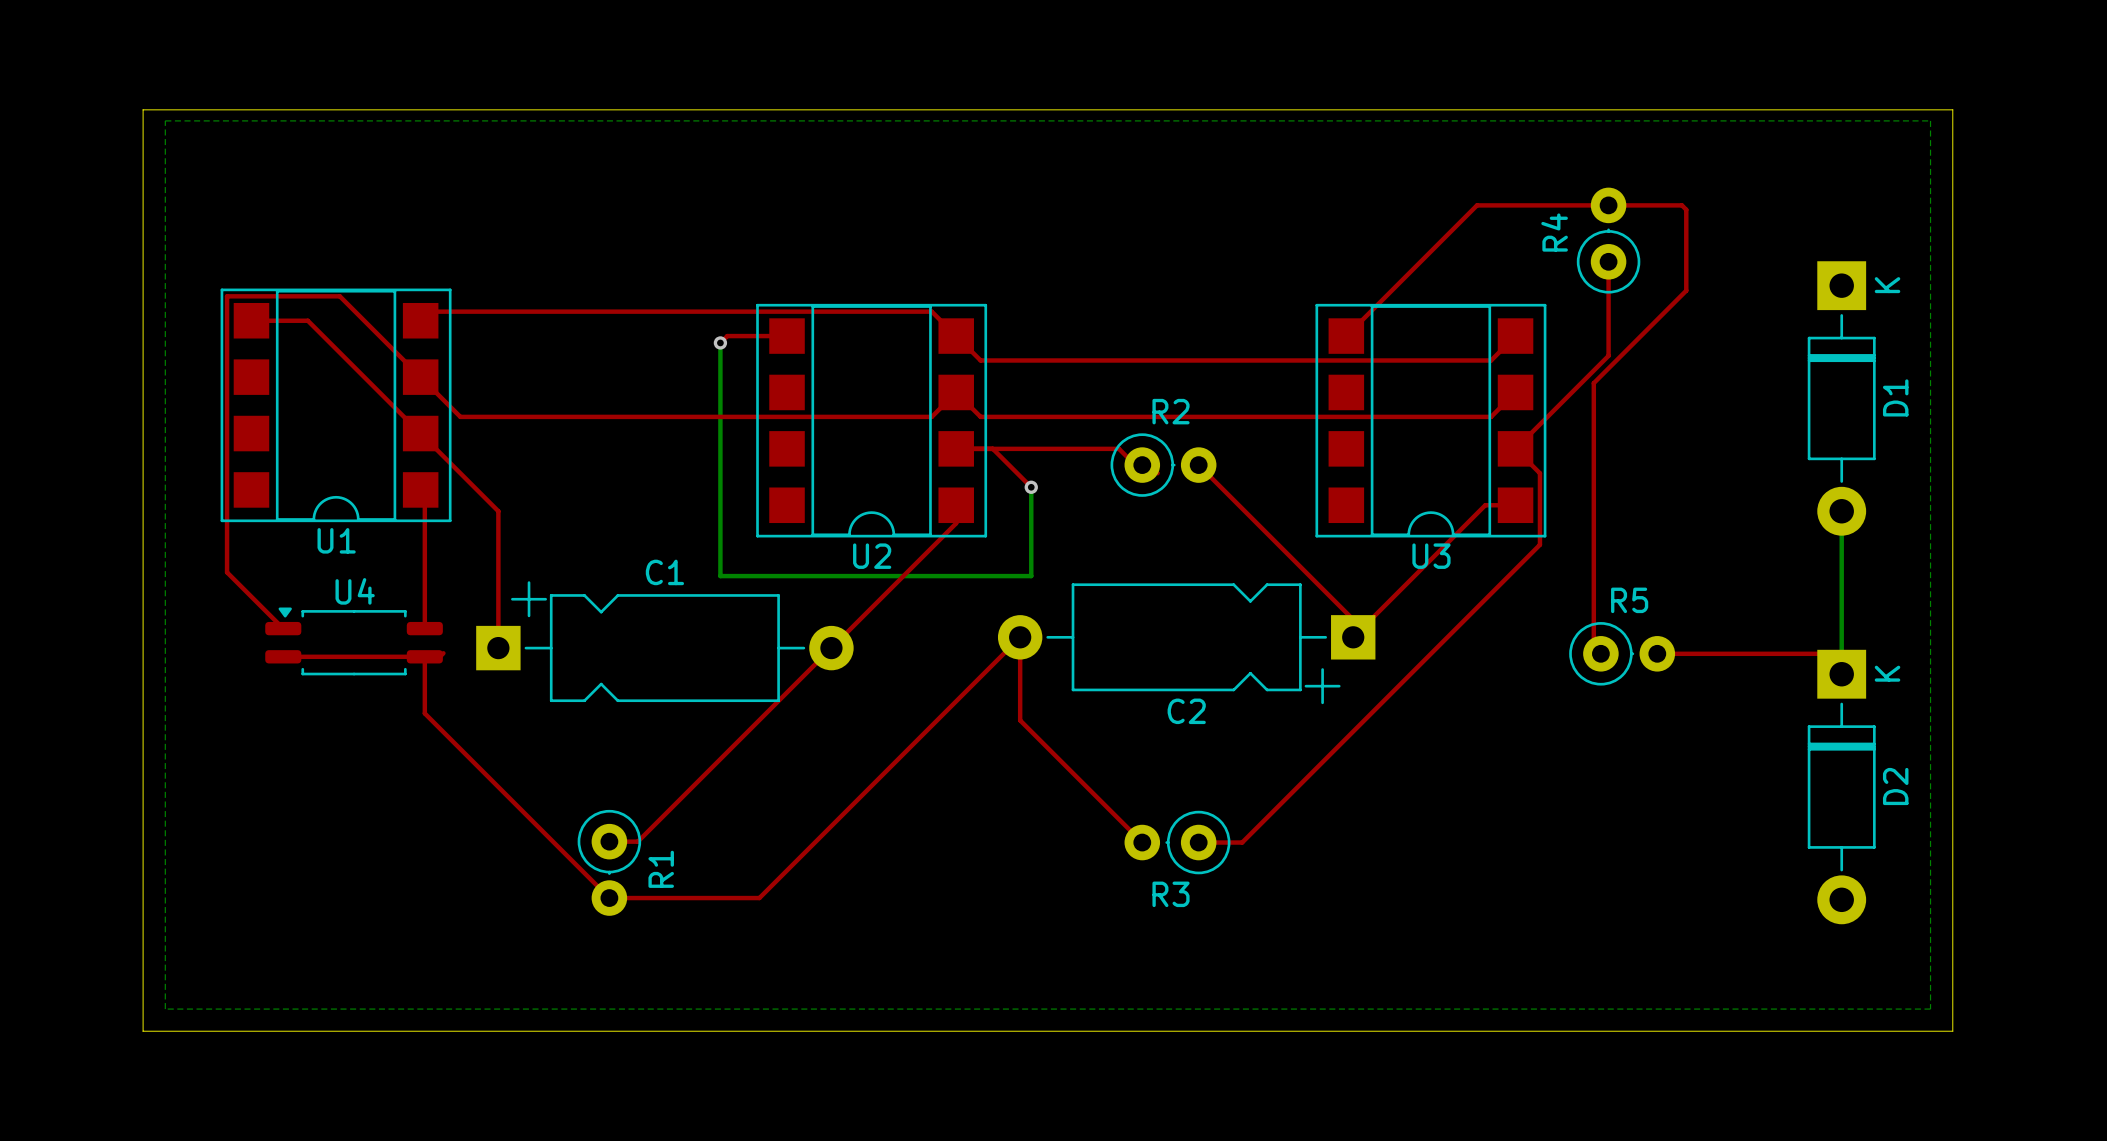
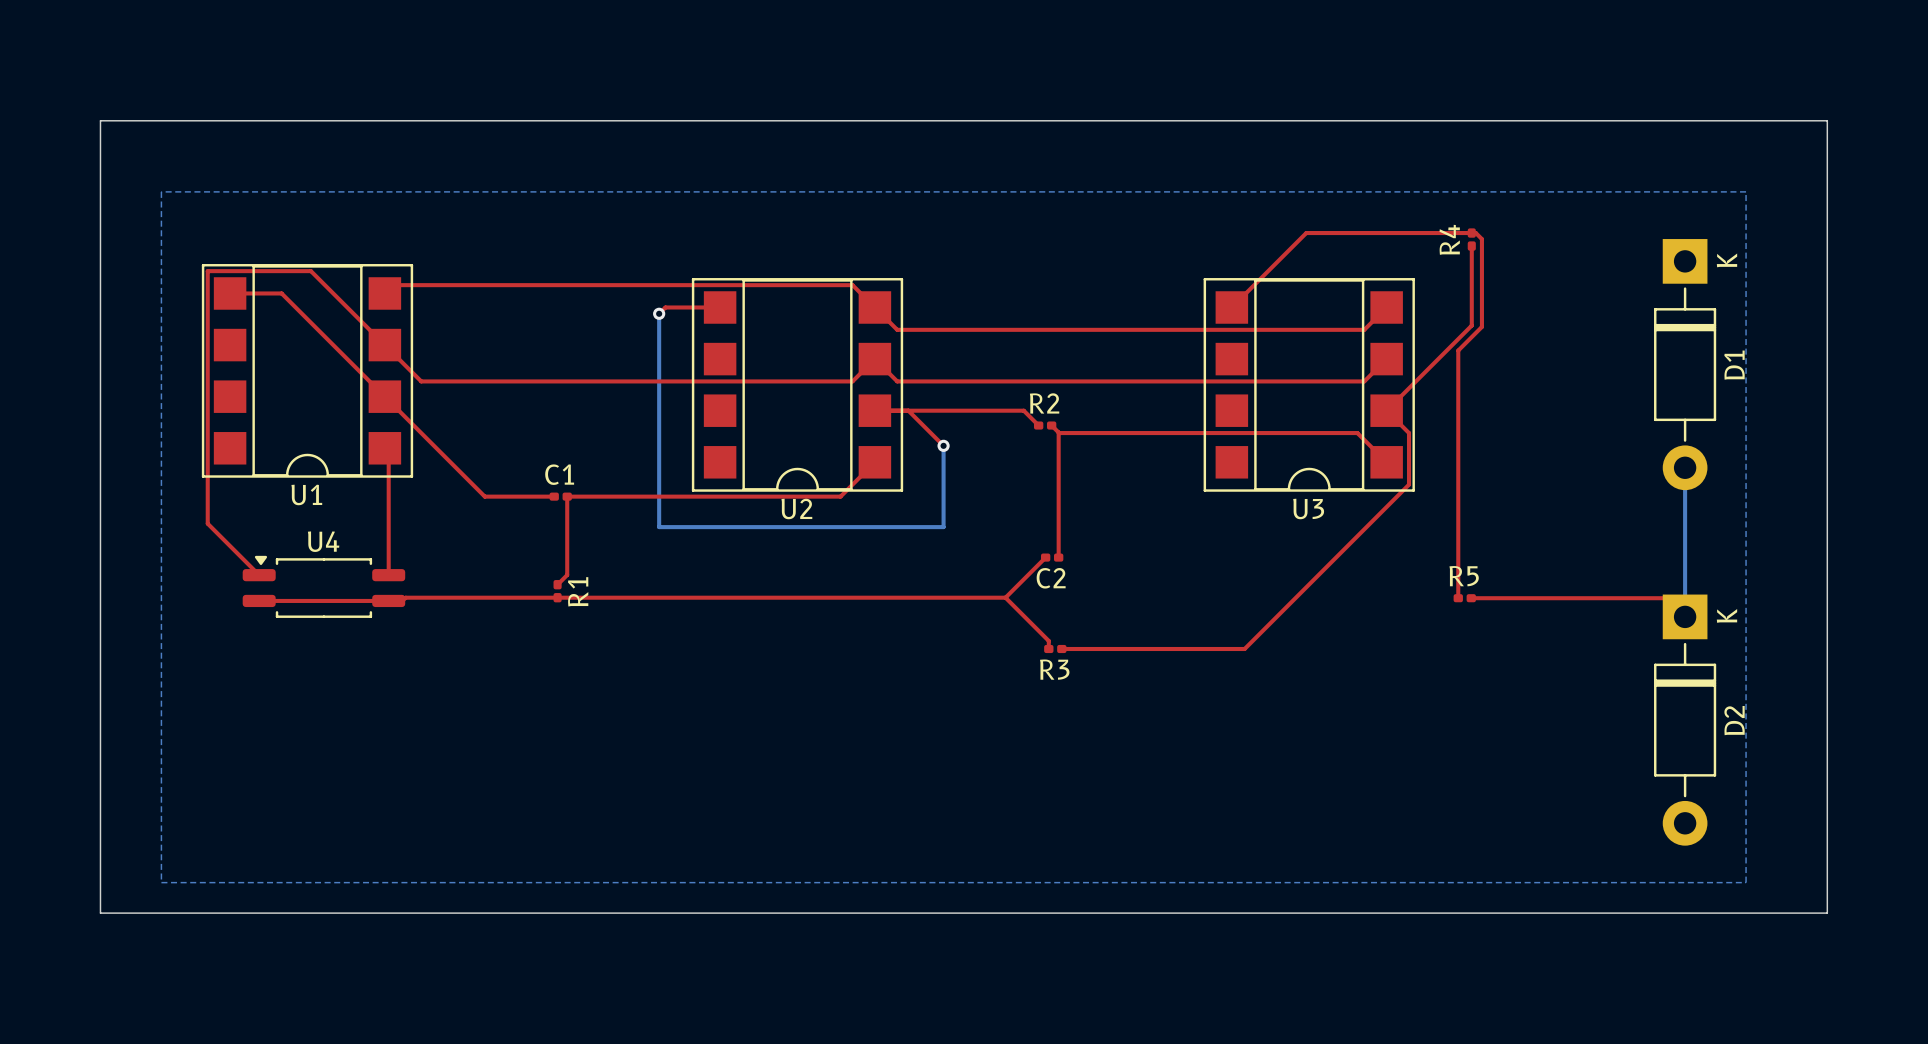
board edge: (143, 109) (1952, 109) (1952, 1031) (143, 1031) (143, 109) -> (100, 120) (100, 913) (1827, 913) (1827, 120) (100, 120)
bottom zone outline: (165, 120) (165, 1009) (1930, 1009) (1930, 120) (165, 120) -> (161, 191) (161, 882) (1746, 882) (1746, 191) (161, 191)
R4 footprint: [1576, 187, 1641, 294] -> [1467, 228, 1476, 251]
top track: (1427, 254) (1477, 205) (1681, 205) (1686, 209) (1686, 290) (1619, 357) -> (1306, 233) (1471, 233)
top track: none -> (1481, 239) (1481, 326)
R2 footprint: [1110, 433, 1217, 497] -> [1033, 421, 1057, 430]
top track: (1198, 465) (1353, 619) (1353, 637) (1485, 505) (1515, 505) -> (1059, 433) (1357, 433) (1386, 462)
top track: none -> (1058, 432) (1058, 557)
top track: (956, 505) (956, 523) (637, 841) (609, 841) -> (874, 462) (840, 496) (567, 496) (567, 575) (557, 584)
top track: (498, 511) (498, 648) -> (456, 467) (484, 496) (554, 496)
top track: (1539, 529) (1539, 544) (1242, 842) (1198, 842) -> (1409, 484) (1244, 649) (1061, 649)
C1 name position: C1 (664, 572) -> C1 (559, 474)
C1 footprint: [476, 581, 854, 703] -> [549, 492, 572, 501]
C2 footprint: [997, 583, 1376, 705] -> [1040, 553, 1064, 562]
top track: none -> (1045, 557) (1005, 597)
R5 footprint: [1569, 622, 1676, 686] -> [1453, 594, 1476, 603]
top track: none -> (405, 597) (1005, 597)
top track: none -> (1005, 597) (1048, 640) (1048, 649)
top track: none -> (1471, 598) (1516, 598)
top track: (424, 656) (424, 713) (609, 898) (759, 898) (1020, 637) (1020, 720) (1142, 842) -> none
C2 name position: C2 (1186, 711) -> C2 (1051, 578)
R1 footprint: [577, 809, 642, 916] -> [553, 580, 562, 603]
R3 footprint: [1124, 810, 1231, 875] -> [1044, 644, 1067, 654]

